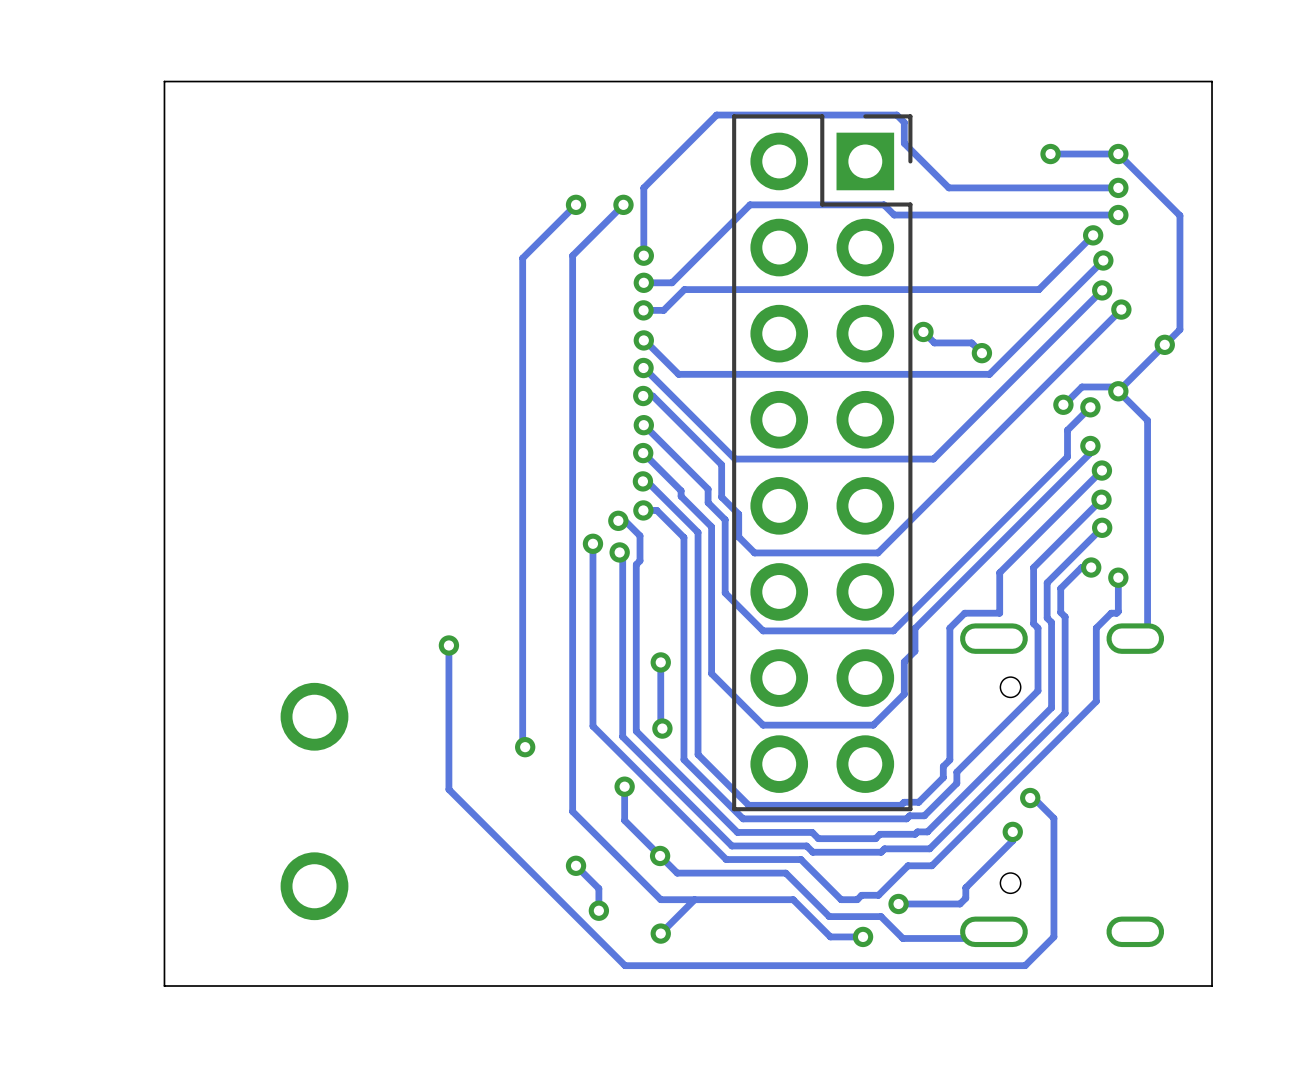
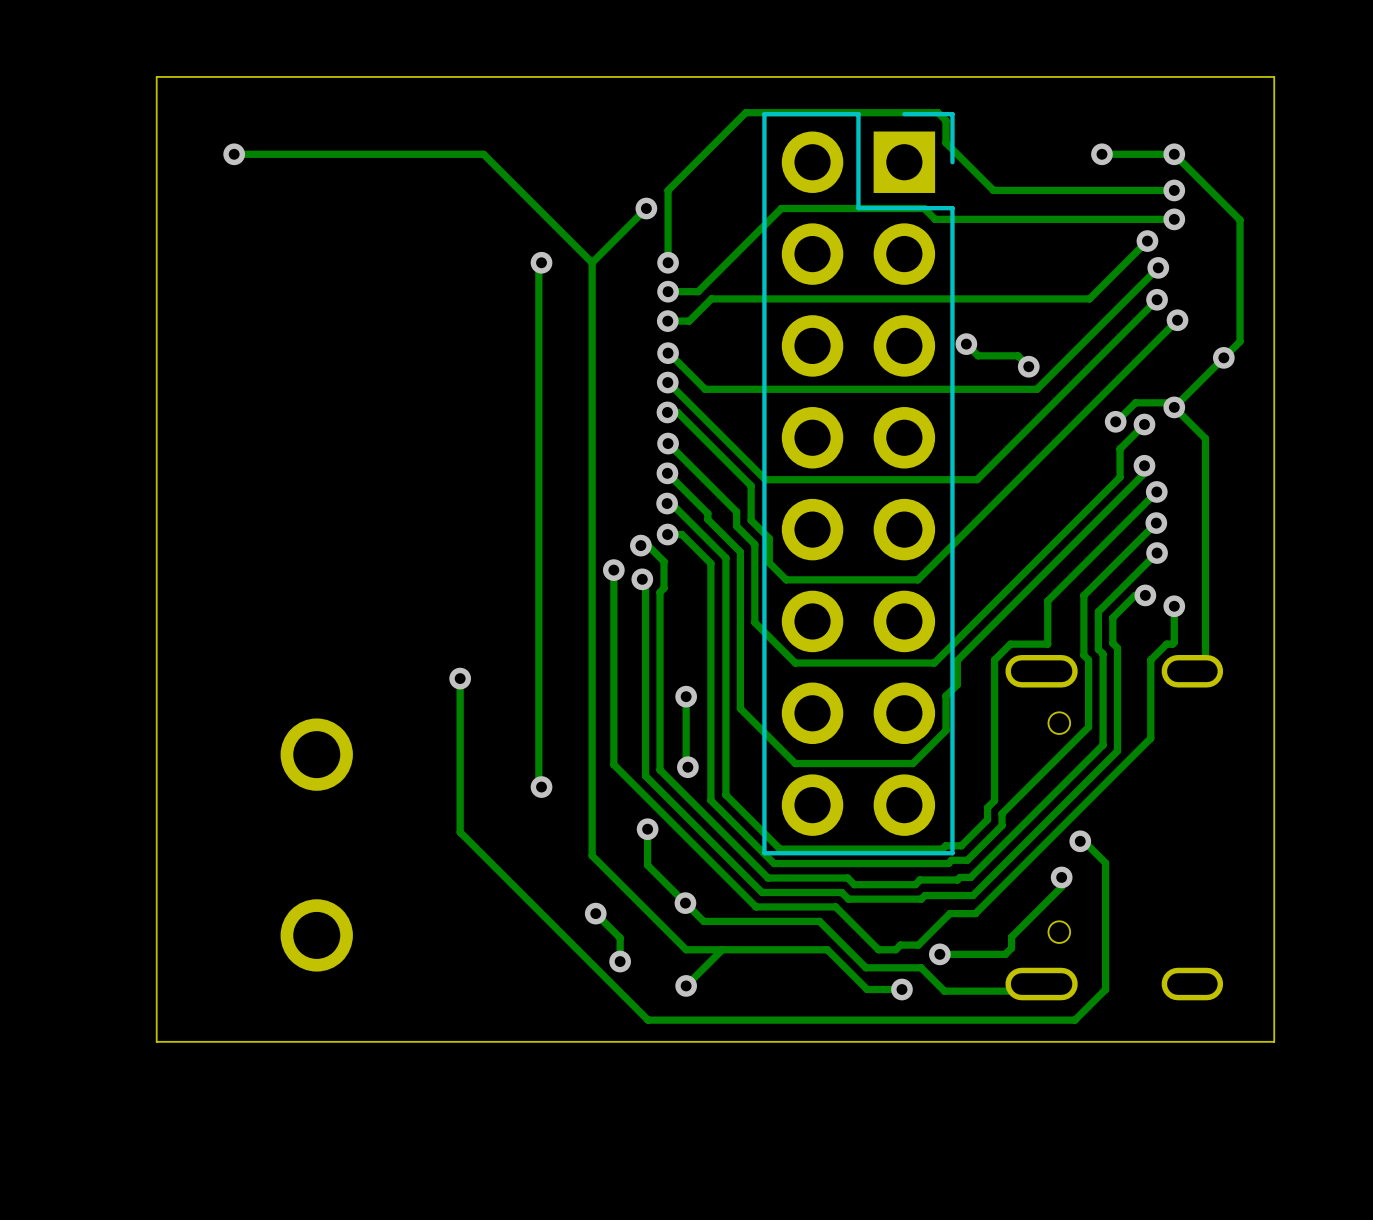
track: none -> (234, 154) (483, 154) (592, 262)
via: none -> (234, 154)
track: (576, 204) (525, 255) -> none
via position: (576, 204) -> (541, 262)

